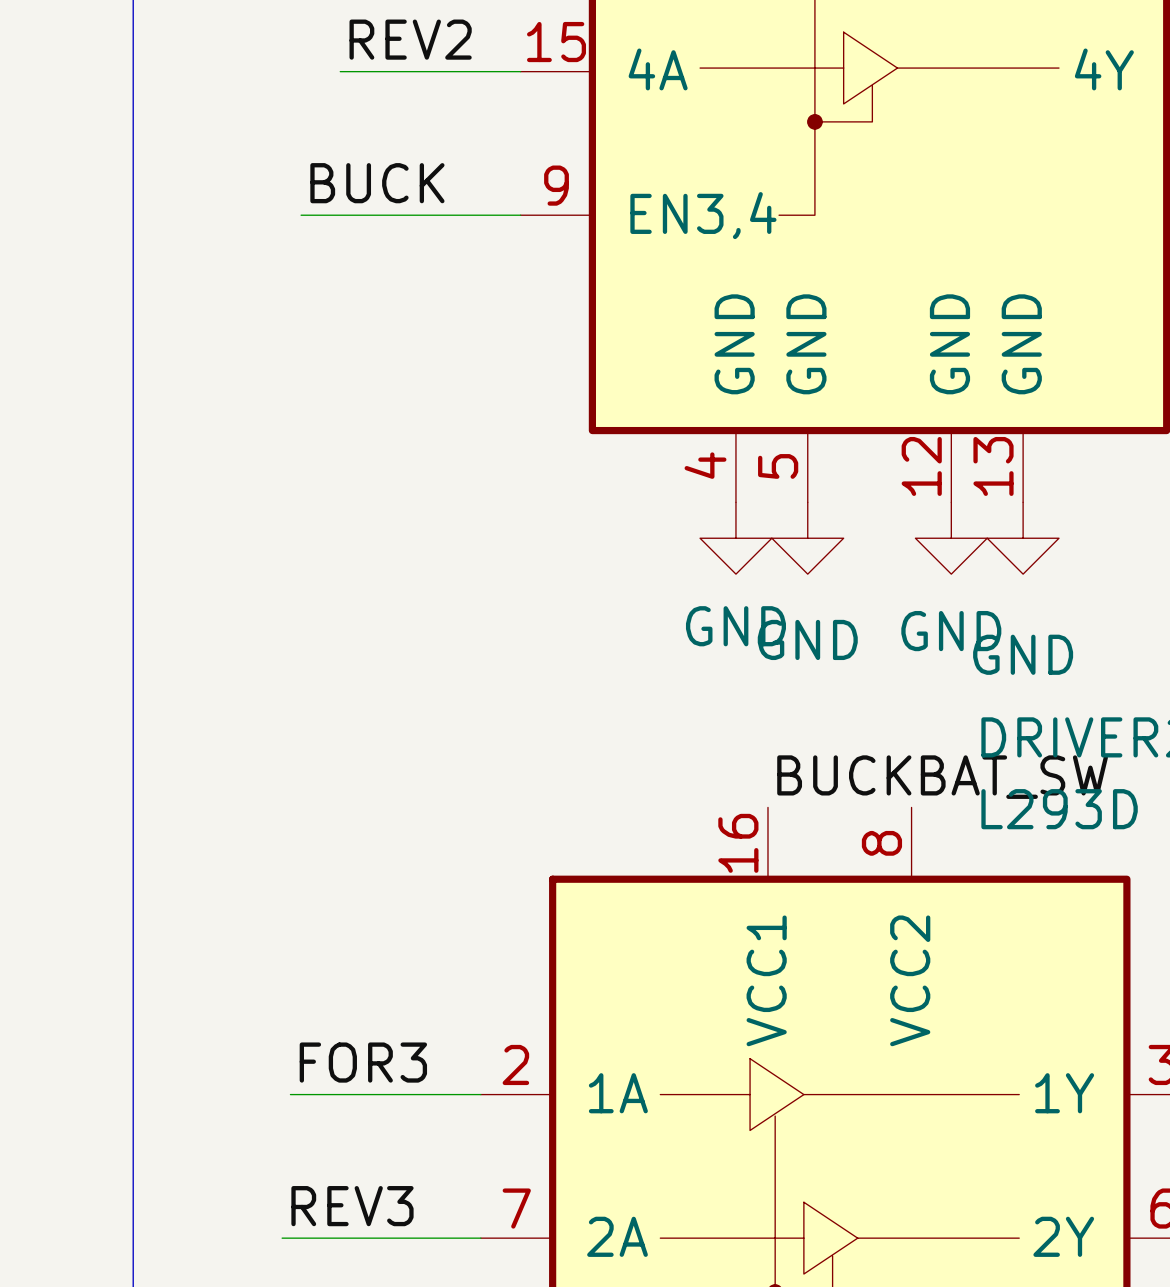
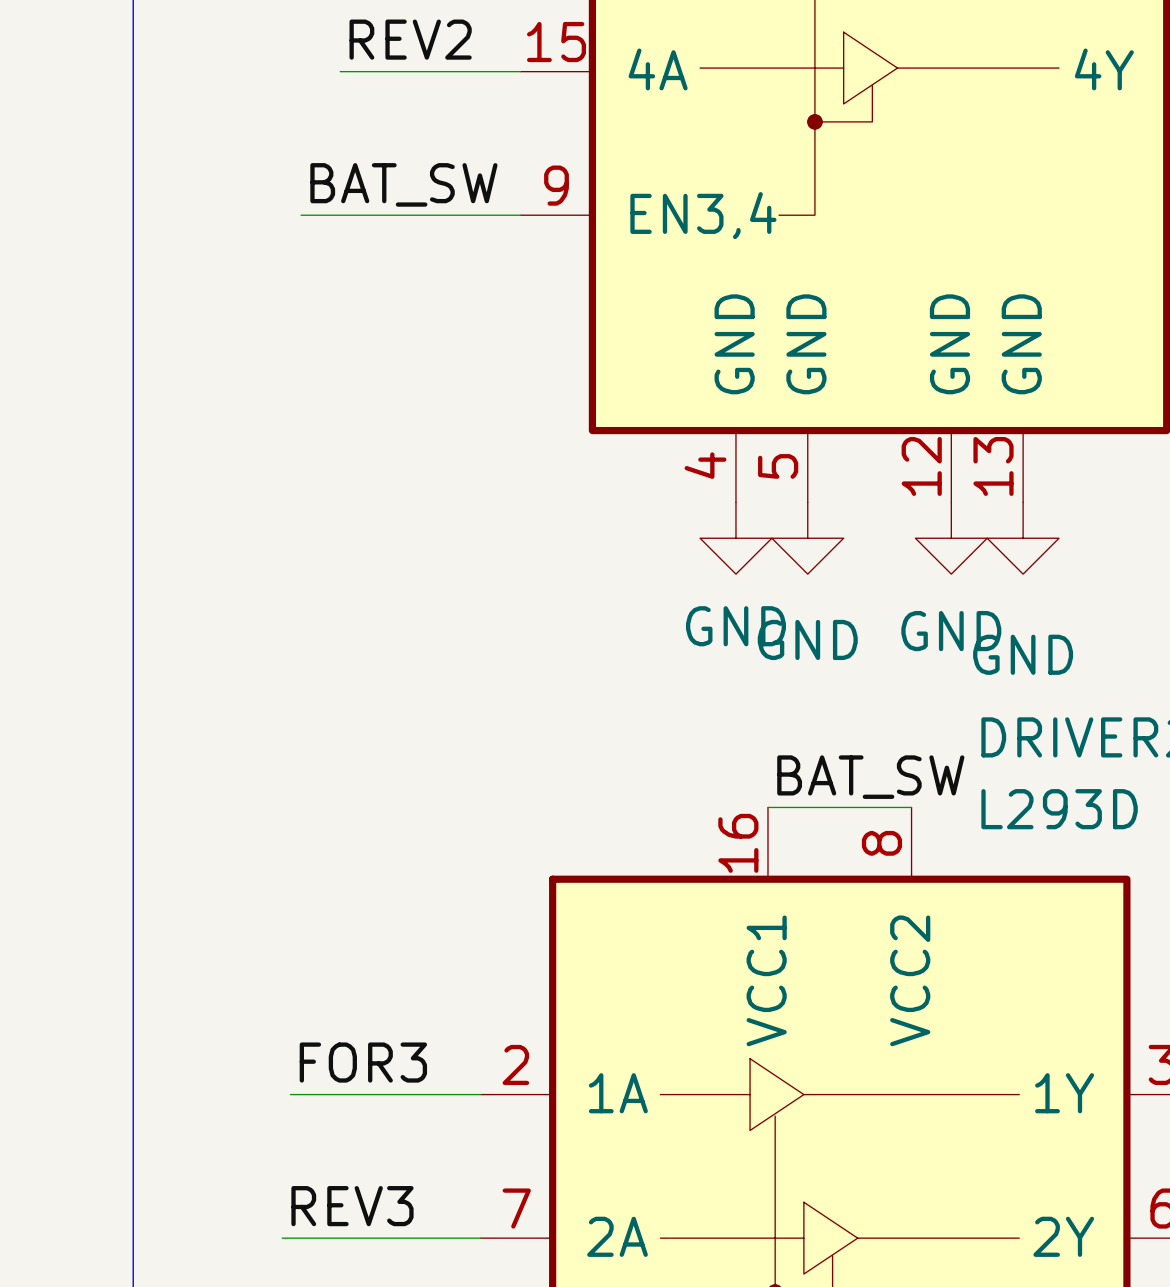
label: BUCK (377, 183) -> BAT_SW (403, 184)
label: BUCK (844, 775) -> BAT_SW (870, 777)
label: BAT_SW (1014, 777) -> none
wire: none -> (767, 807) (911, 807)

